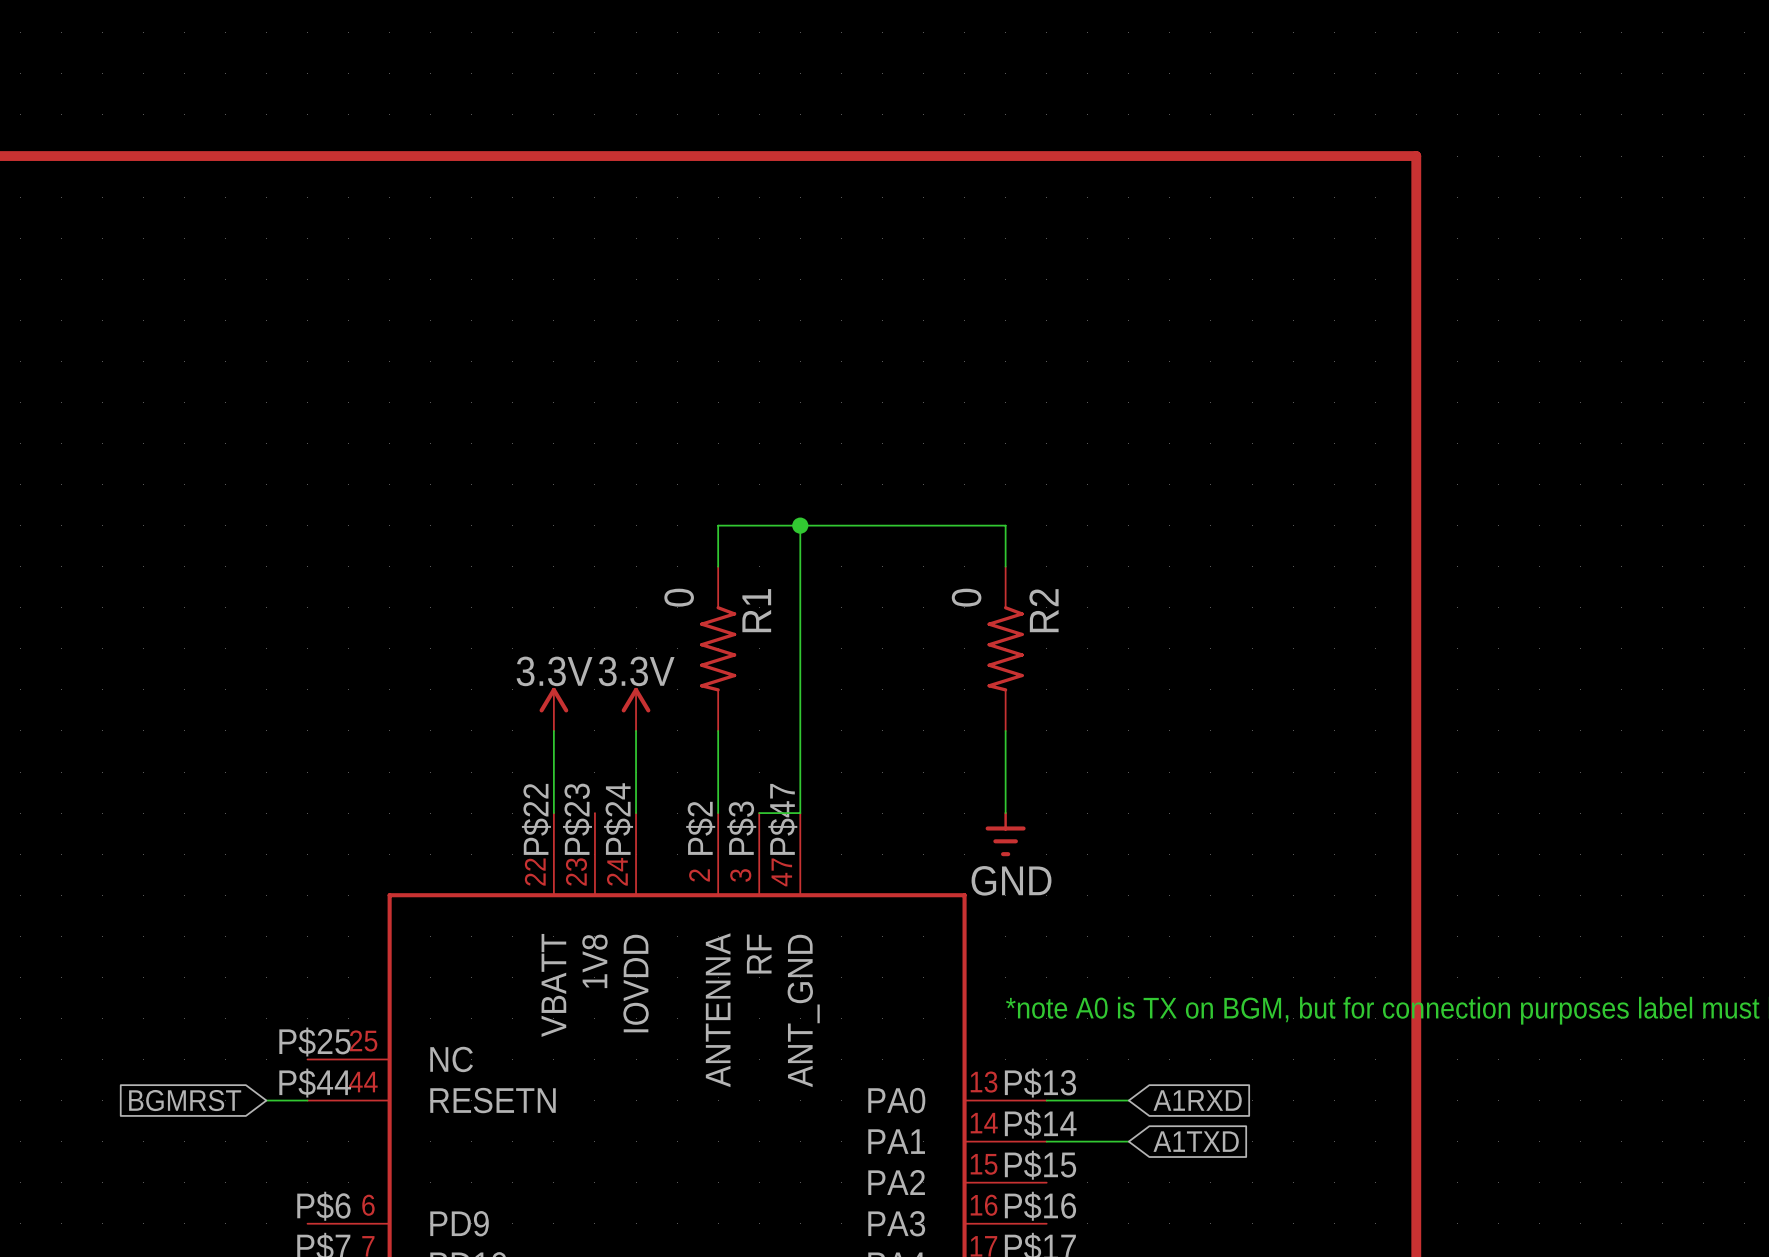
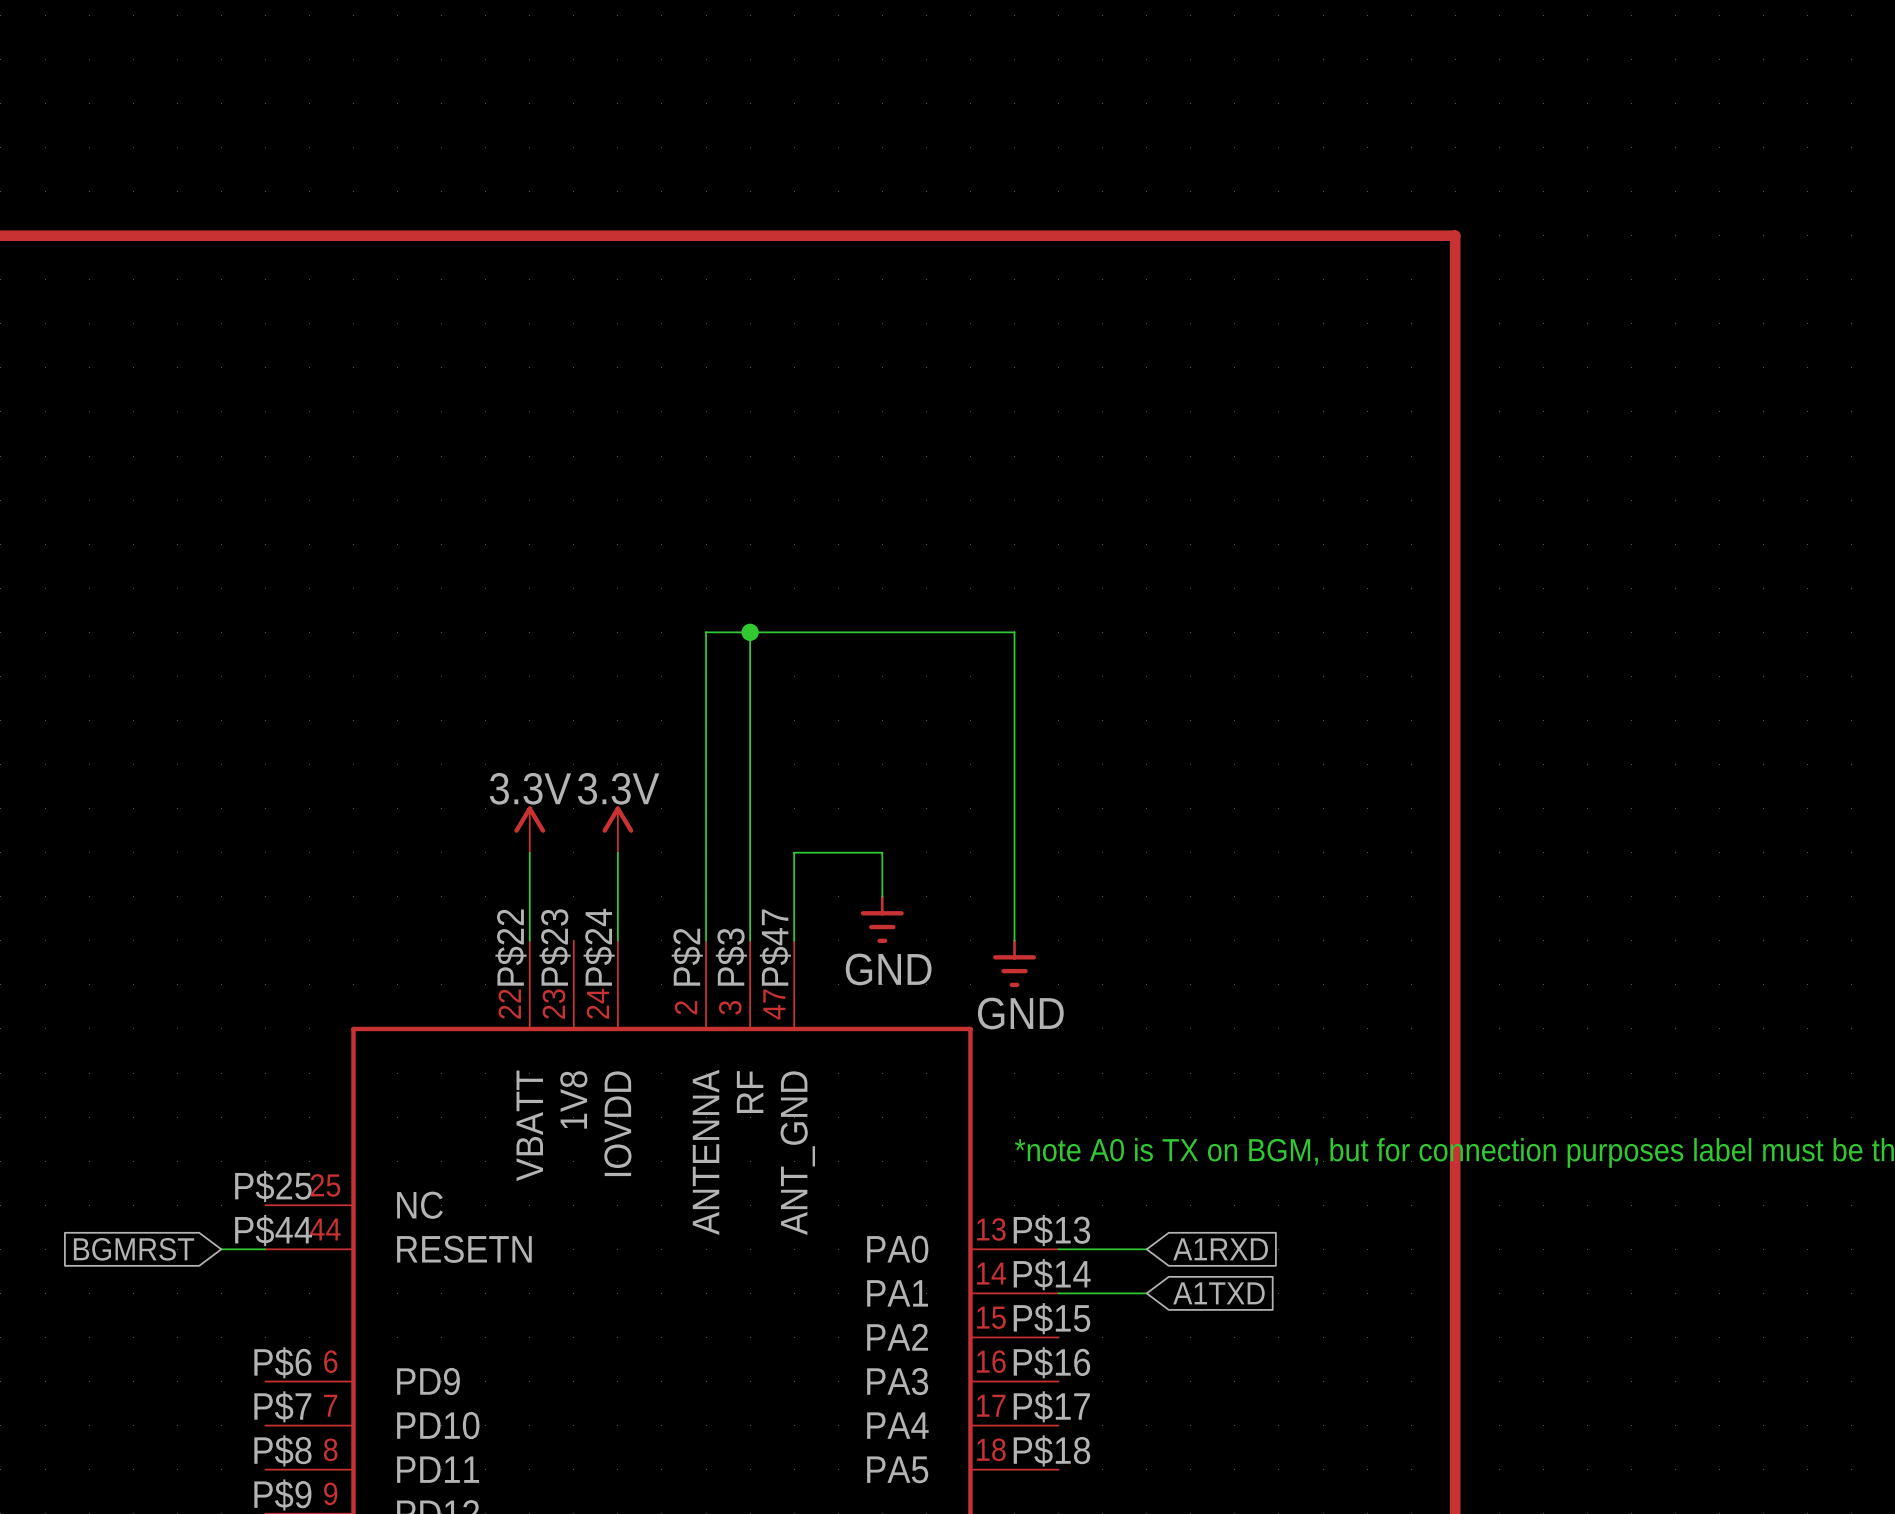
wire: (800, 525) (800, 730) -> (882, 896) (882, 852) (794, 852)
junction position: (800, 525) -> (750, 632)
R1: 0 (718, 648) -> none
R2: 0 (1005, 648) -> none
power symbol: none -> GND (882, 919)
wire: (759, 813) (800, 813) -> (750, 940) (750, 632)

